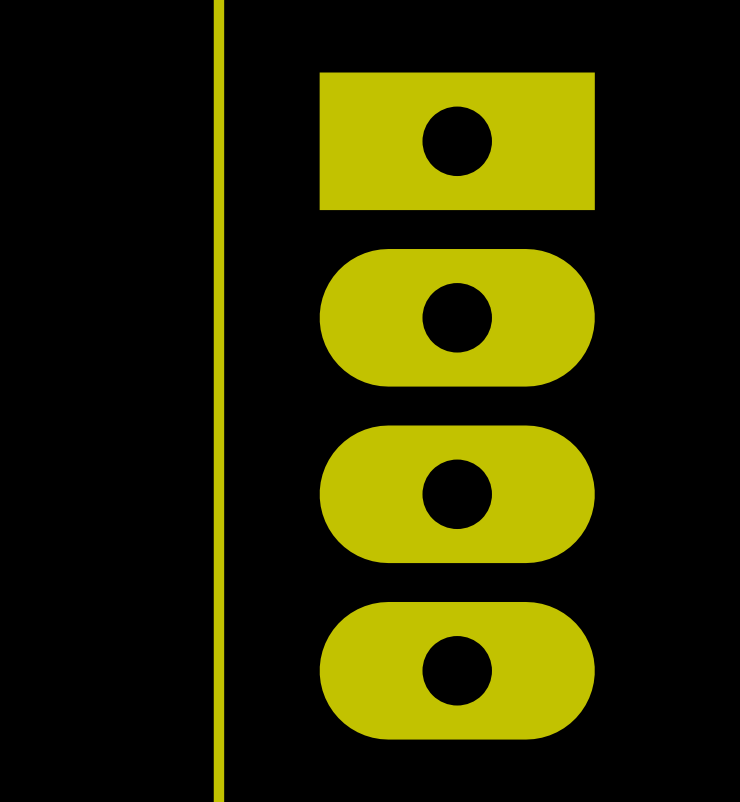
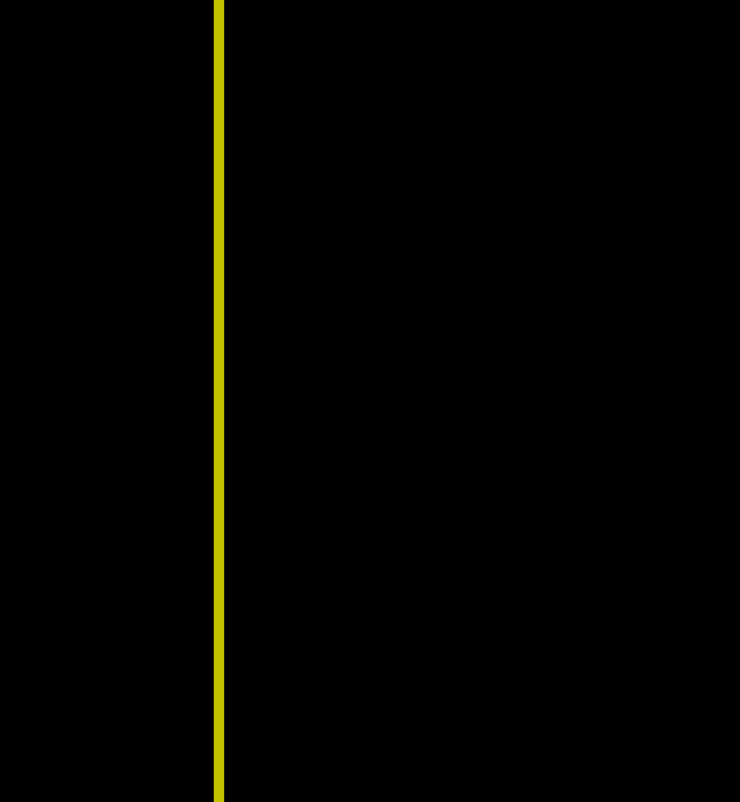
part: (457, 406) -> none

